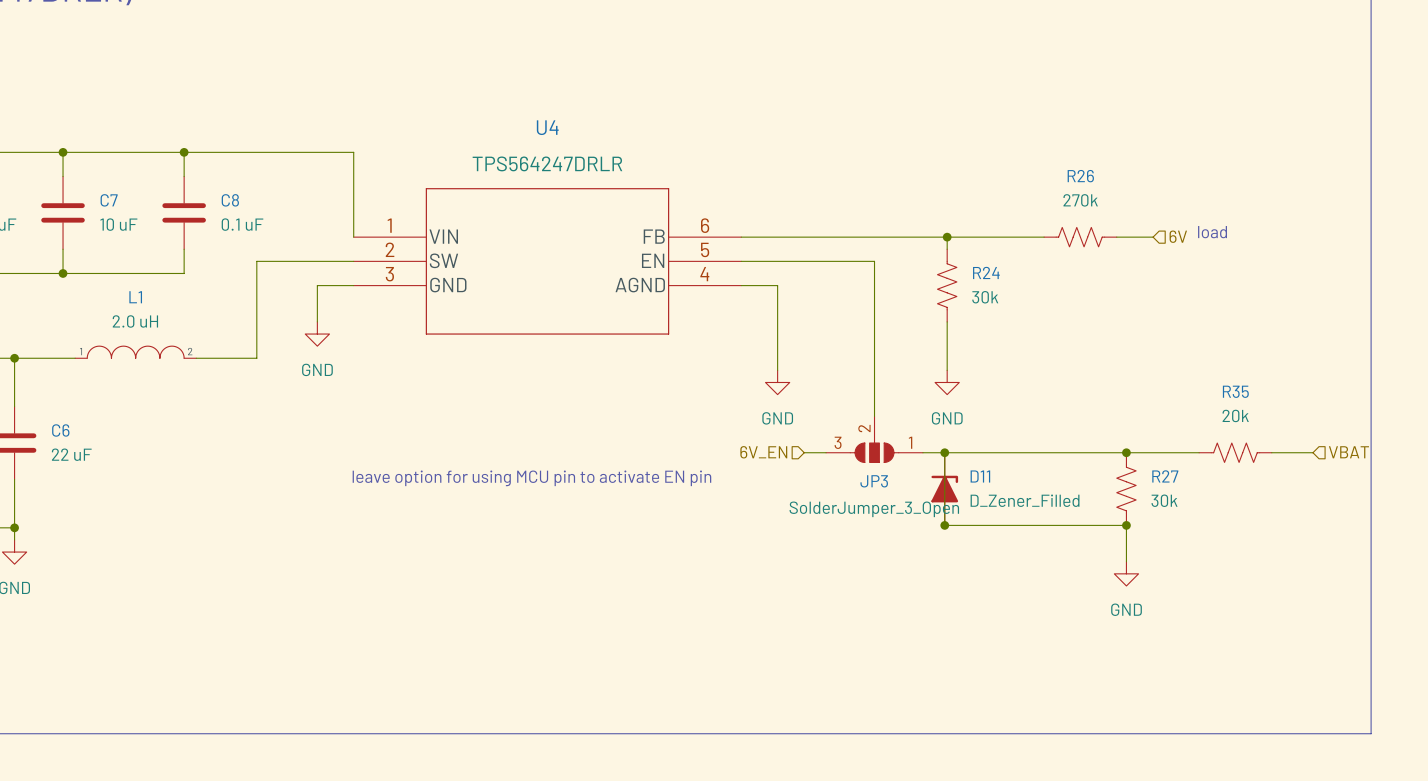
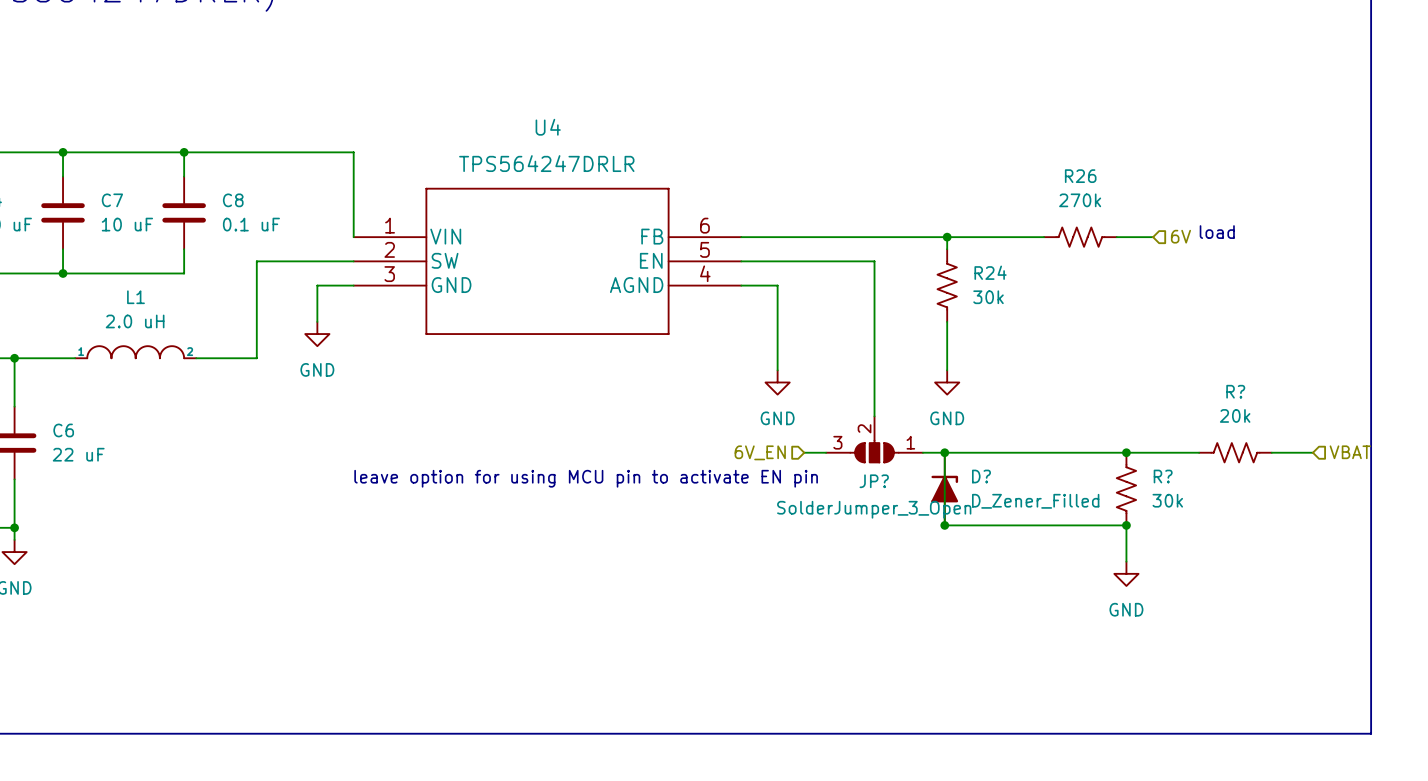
R35 name: R35 (1235, 391) -> R? (1235, 391)
D11 name: D11 (980, 476) -> D? (981, 476)
R27 name: R27 (1165, 476) -> R? (1163, 476)
JP3 name: JP3 (874, 481) -> JP? (874, 481)

